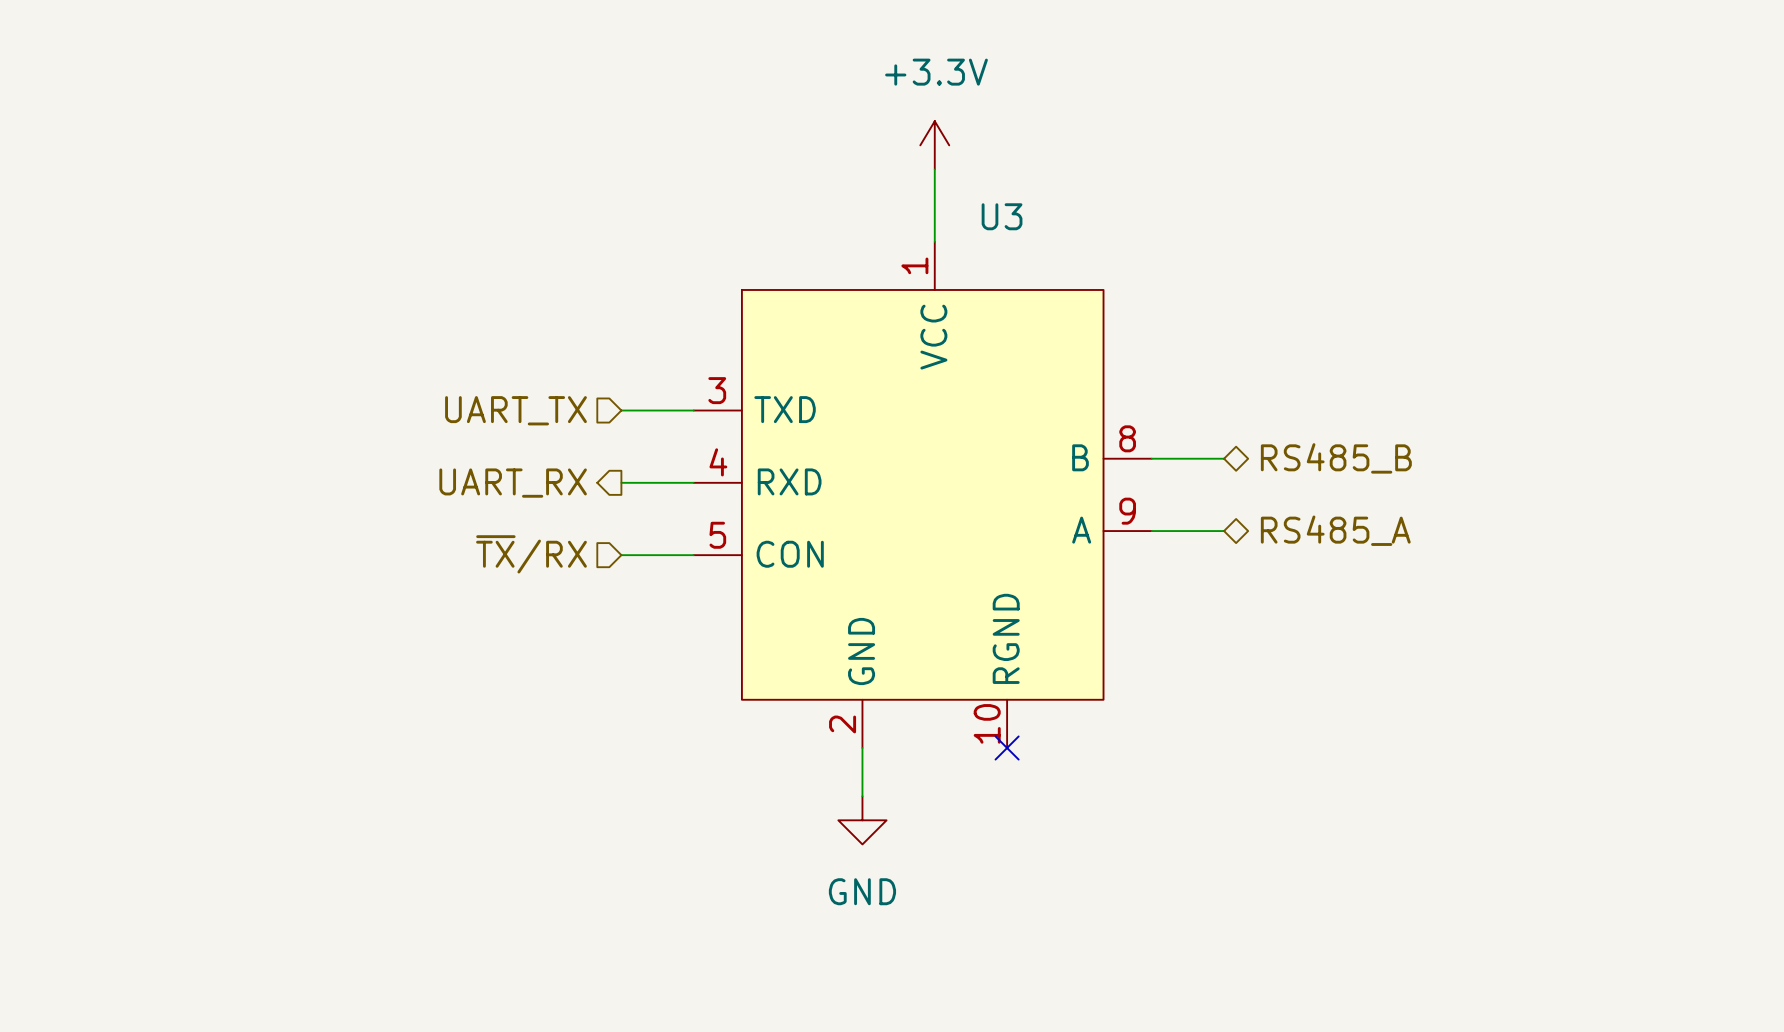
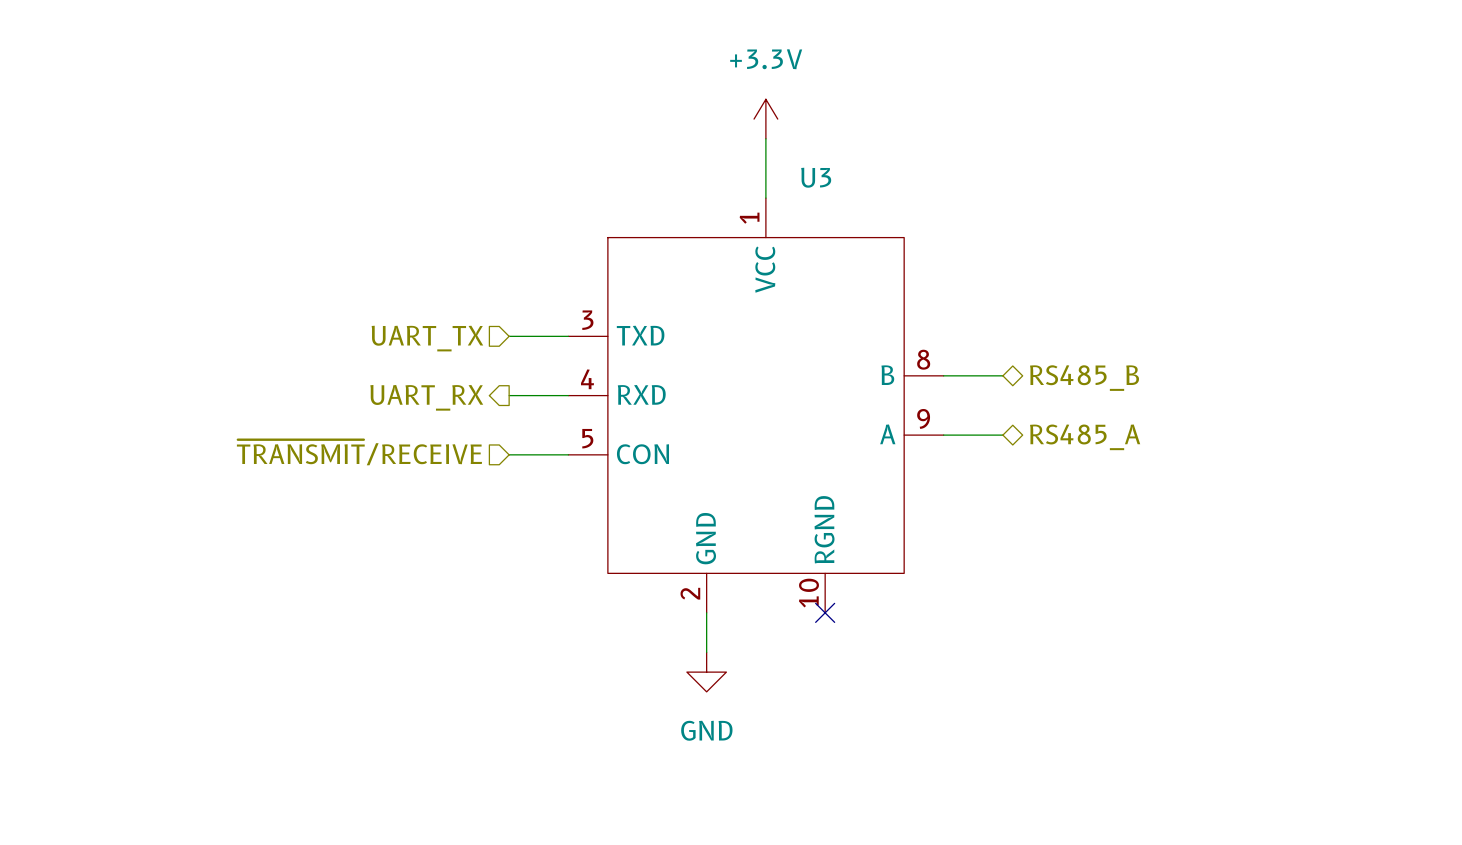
U3 symbol: [693, 241, 1152, 748] -> [568, 198, 944, 613]
hierarchical label: ~{TX}/RX (531, 554) -> ~{TRANSMIT}/RECEIVE (359, 452)

